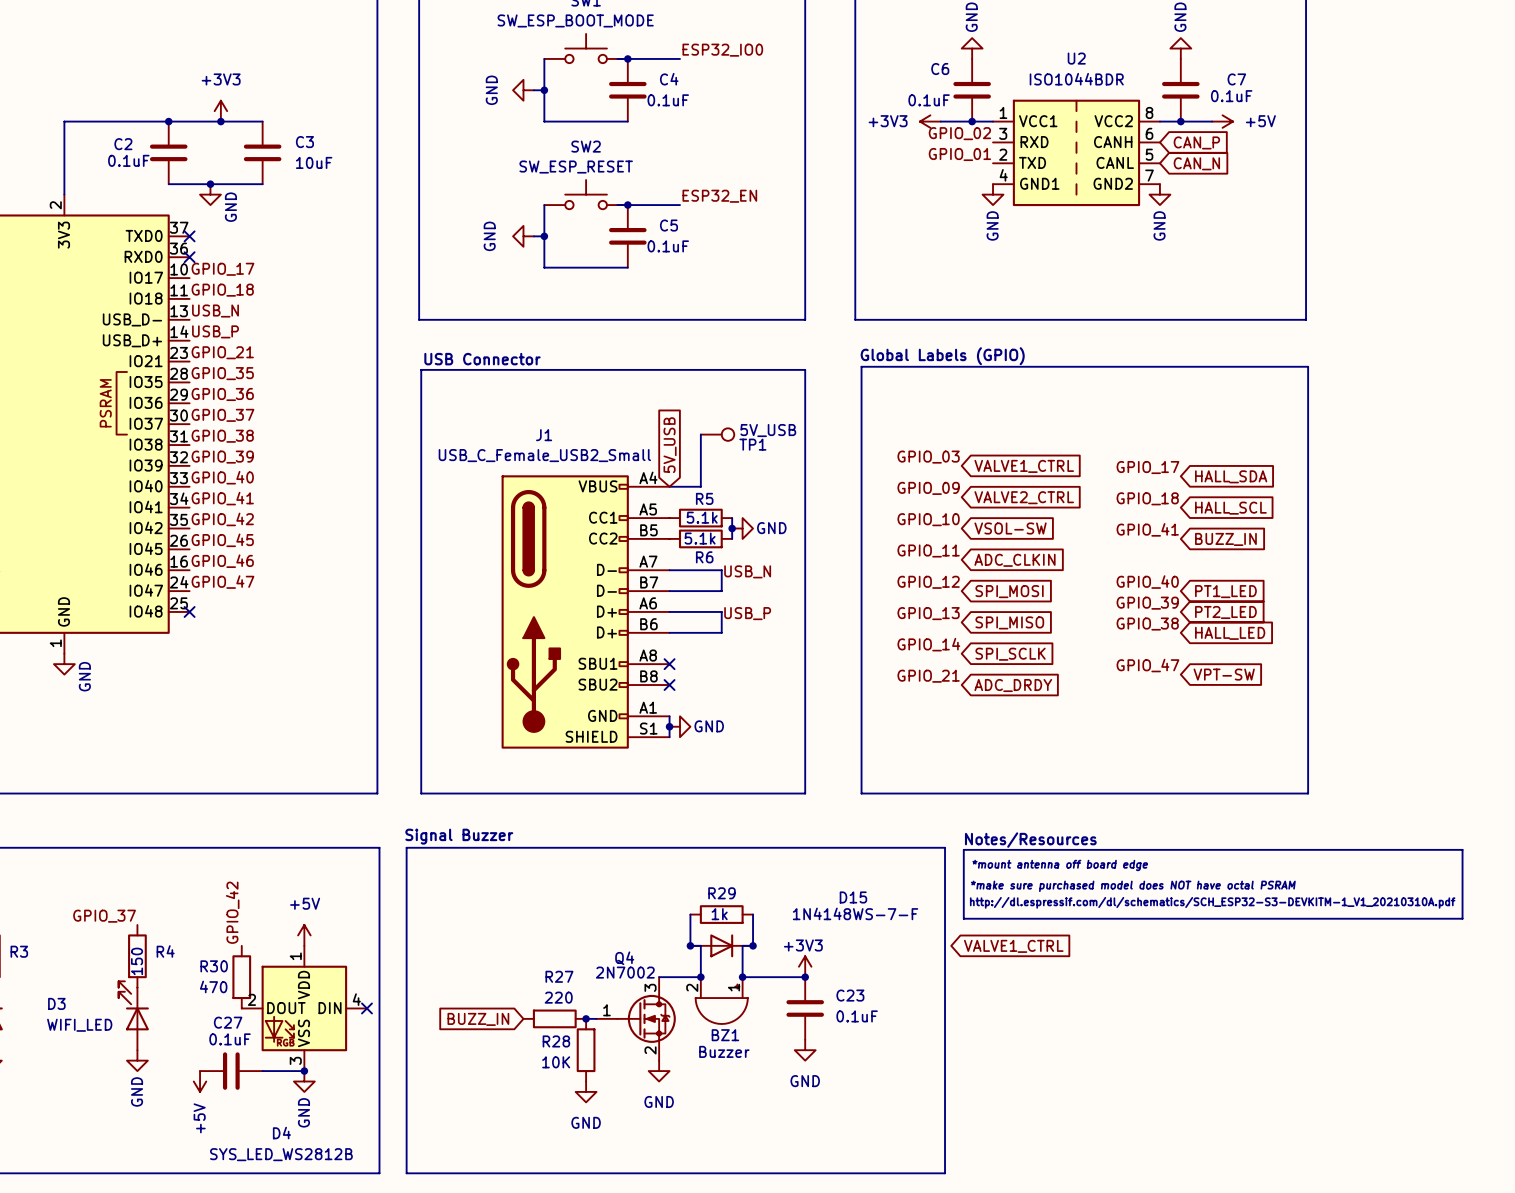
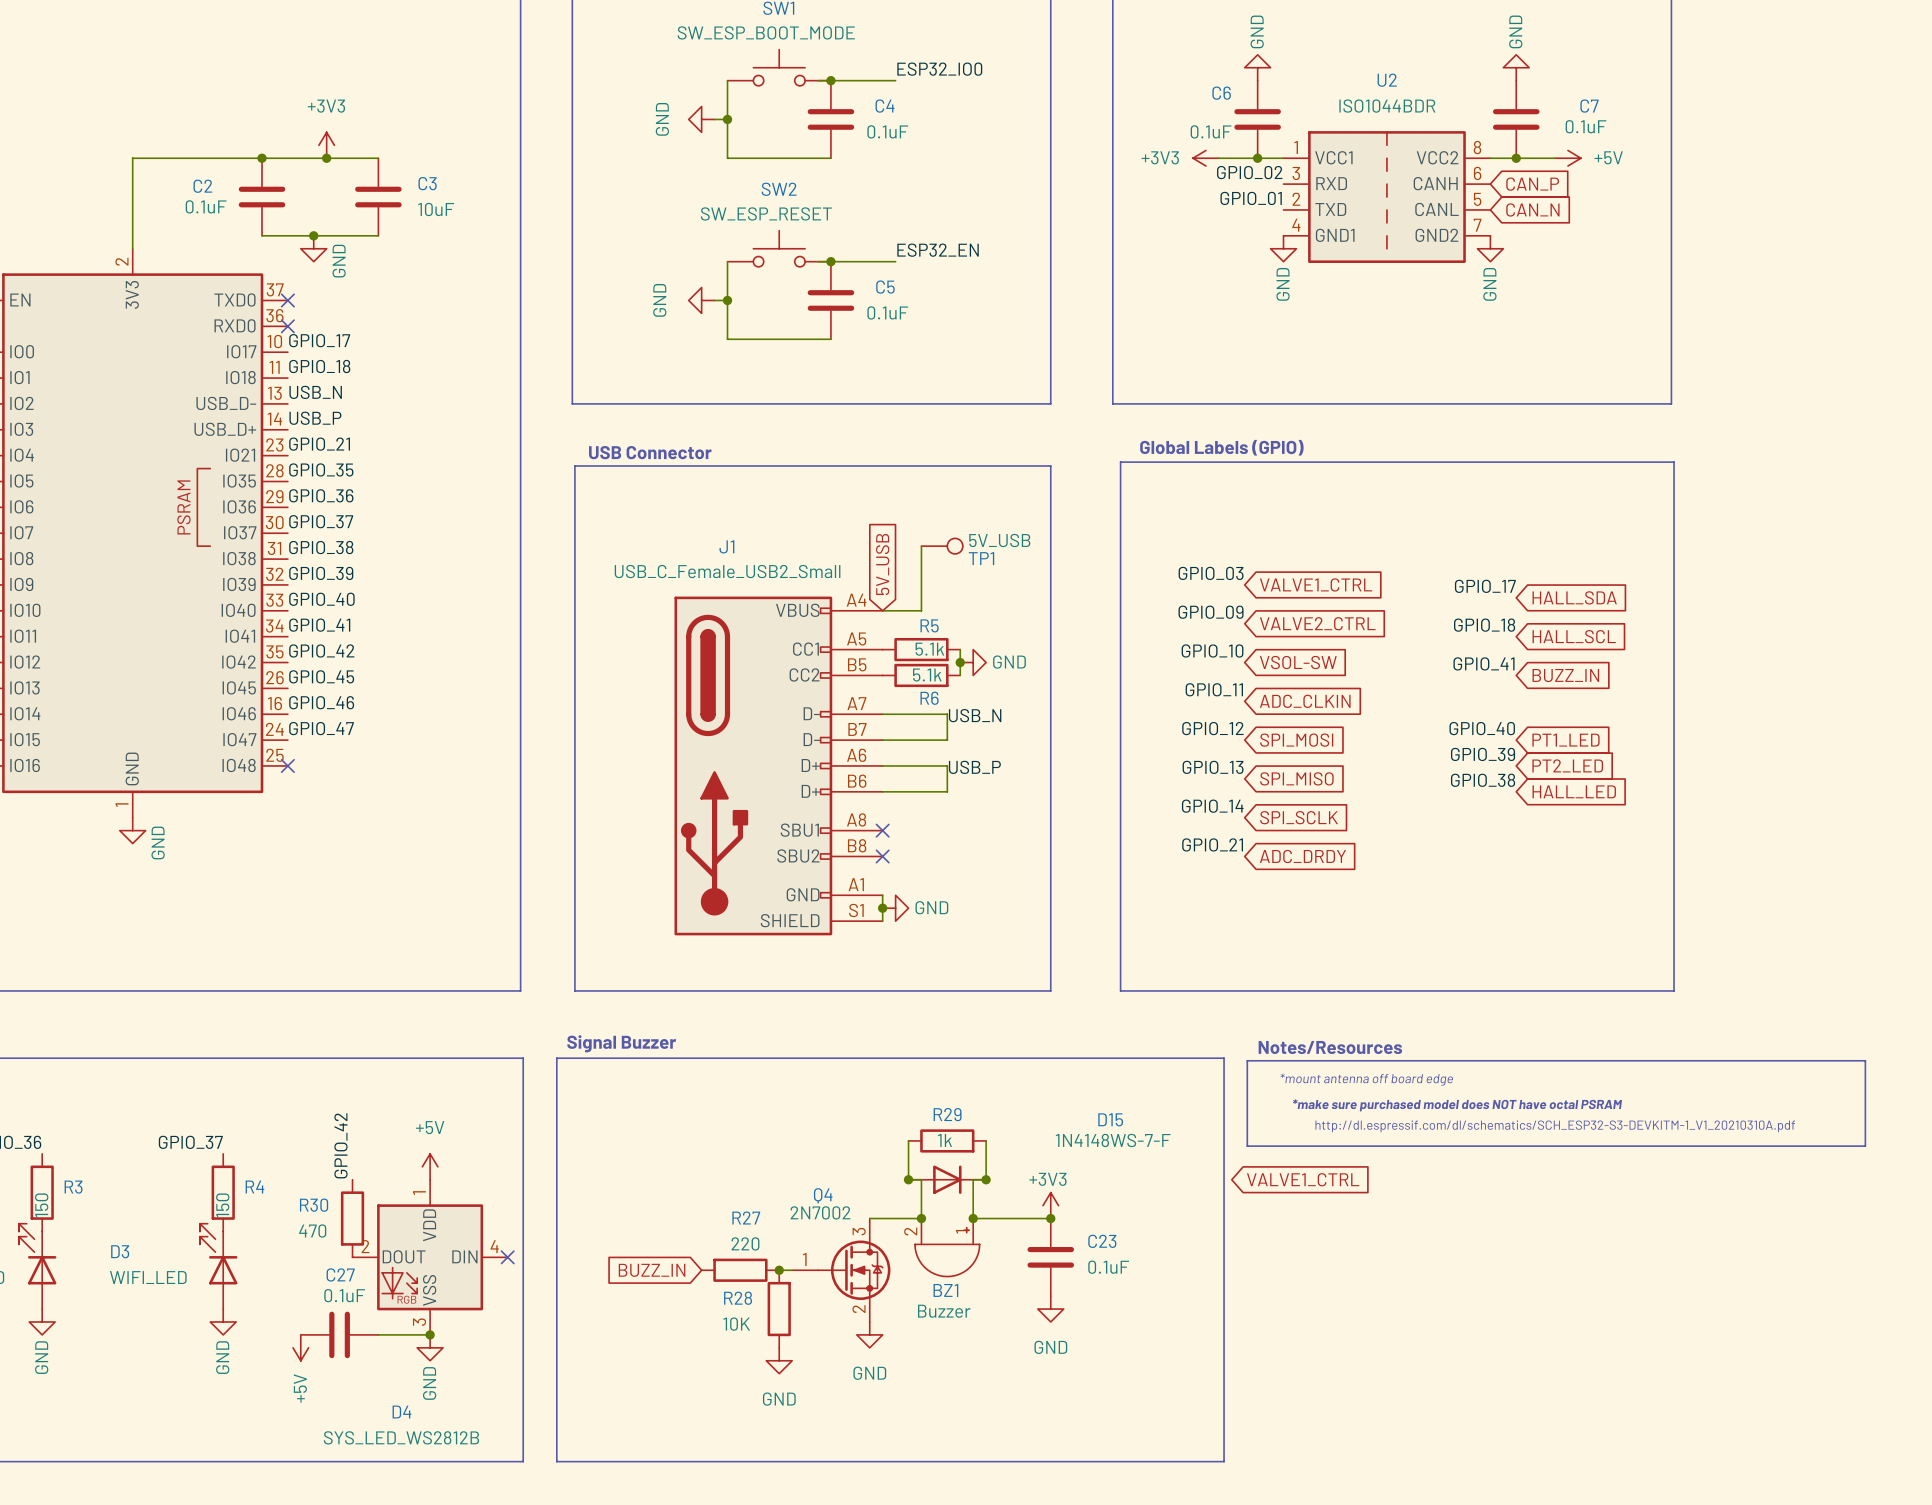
label: GPIO_47 (1147, 665) -> none
global label: VPT-SW (1224, 674) -> none

